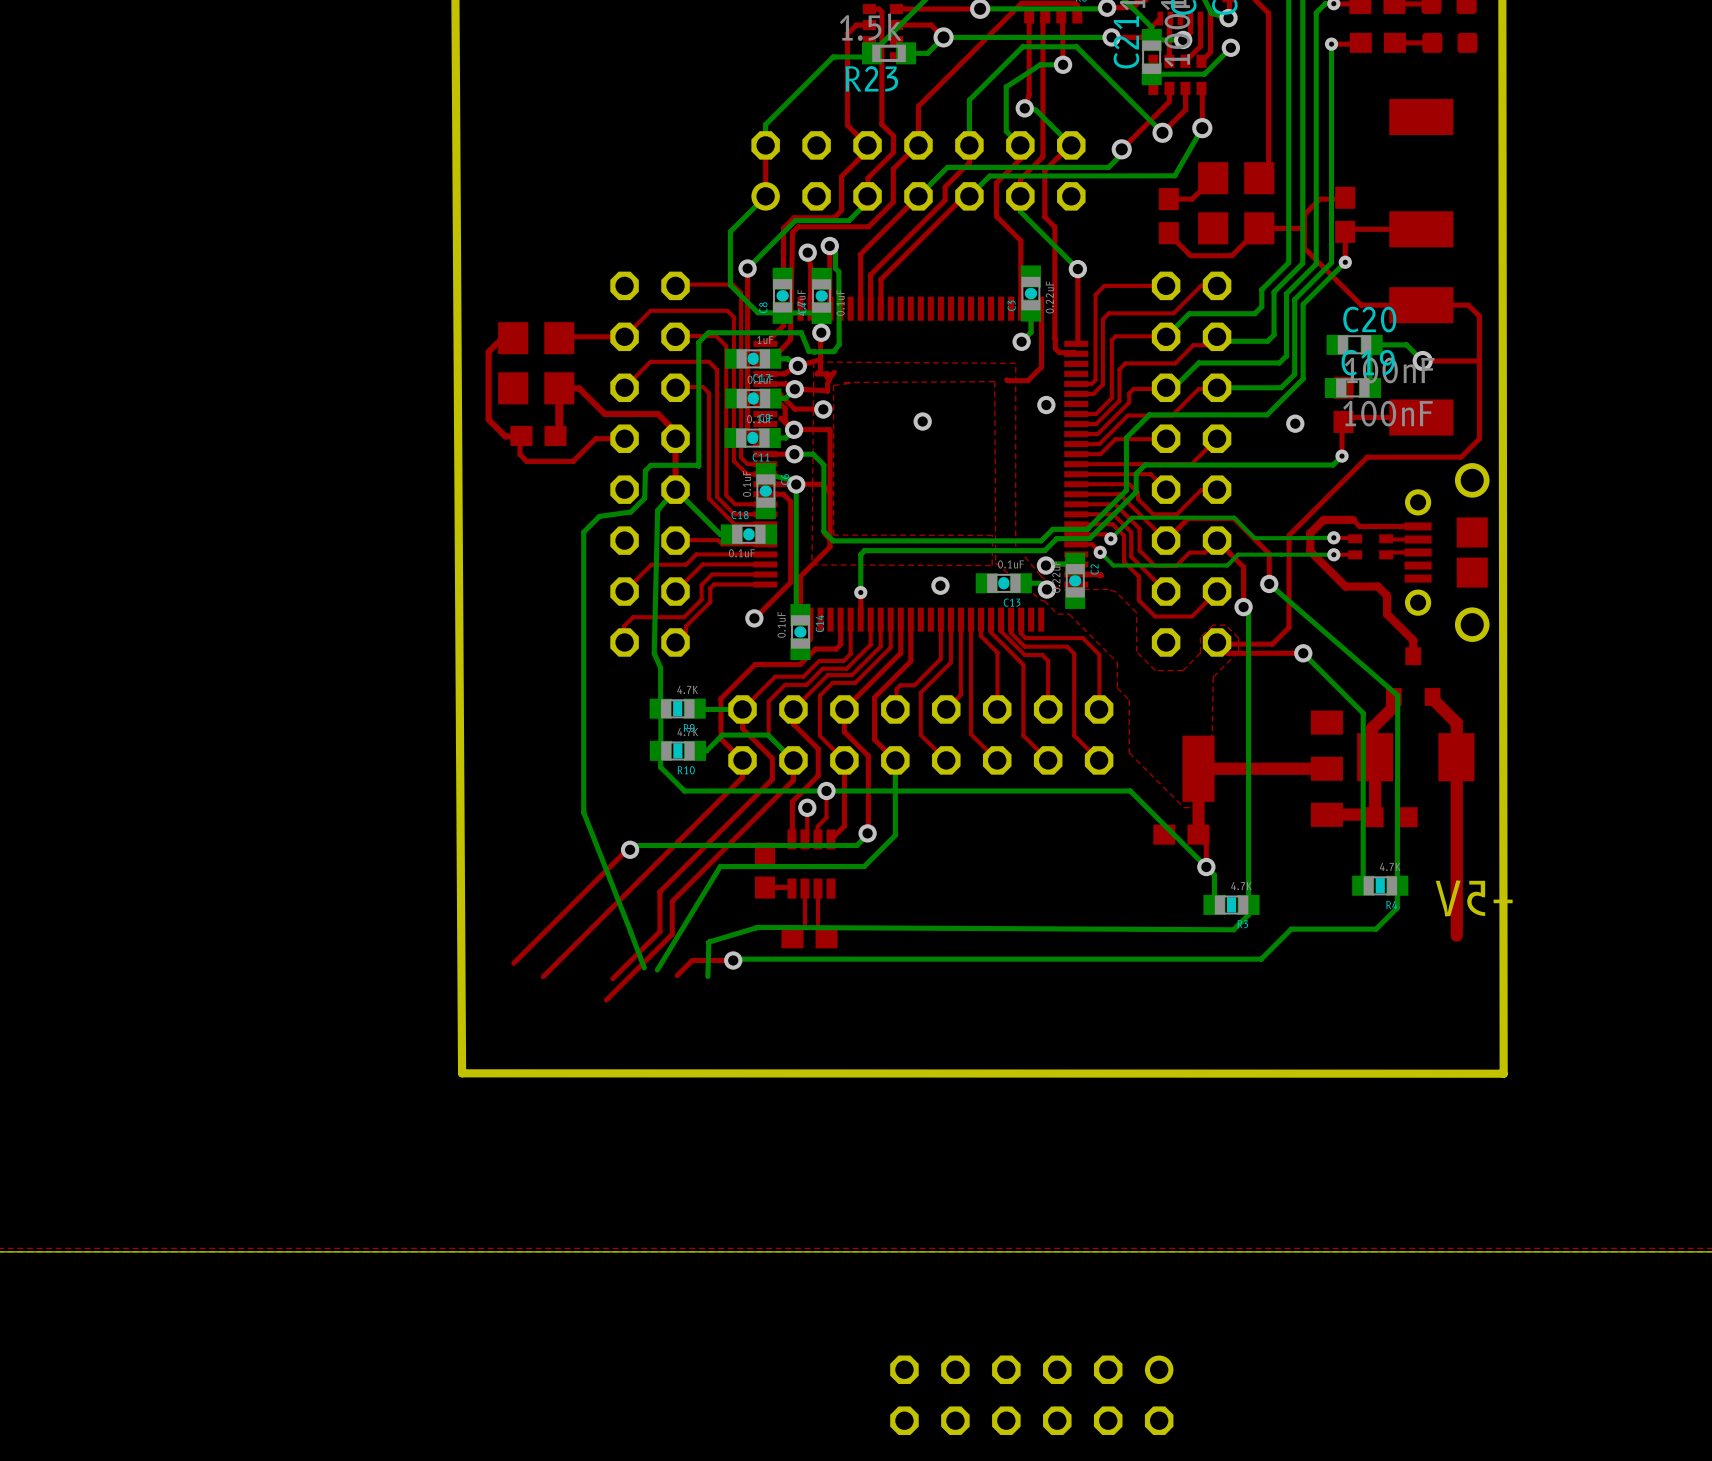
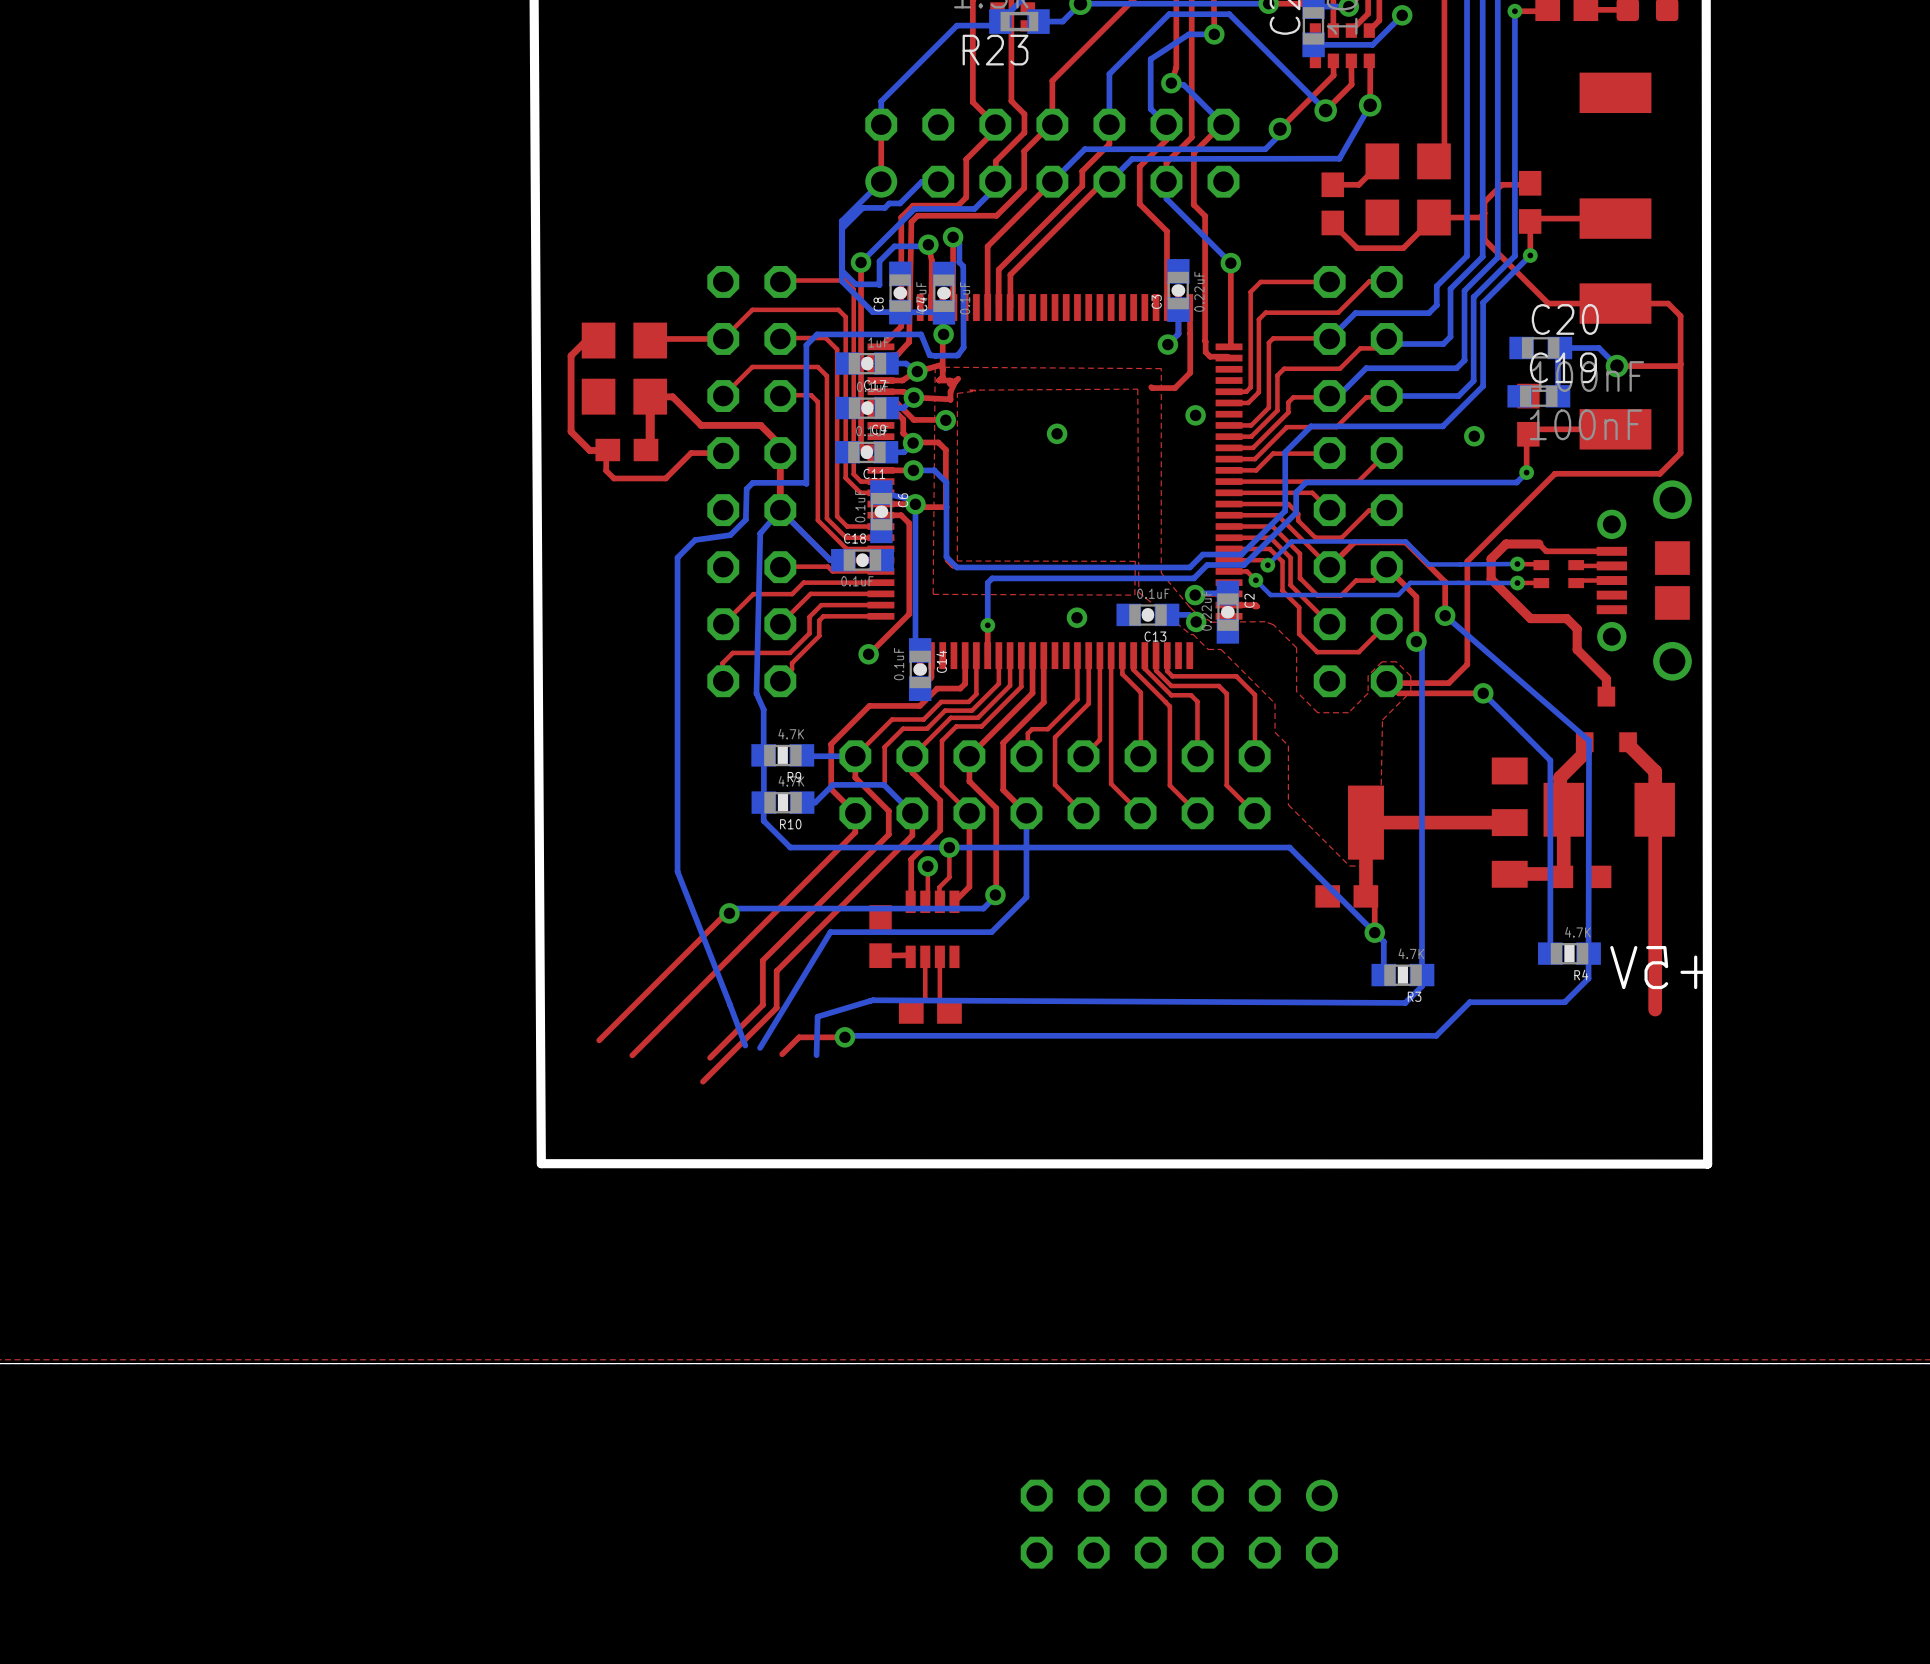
bottom track: none -> (938, 181) (921, 181) (900, 203) (889, 203) (884, 207) (862, 207) (842, 228) (842, 270) (855, 284) (879, 285) (879, 261) (894, 246) (926, 246) (928, 244)
top track: (792, 429) (781, 418) (792, 429) (830, 430) (830, 546) (800, 576) (800, 619) -> none
top track: (795, 484) (821, 484) (830, 492) -> (915, 504) (918, 507) (946, 507) (945, 449) (938, 442) (912, 442)

